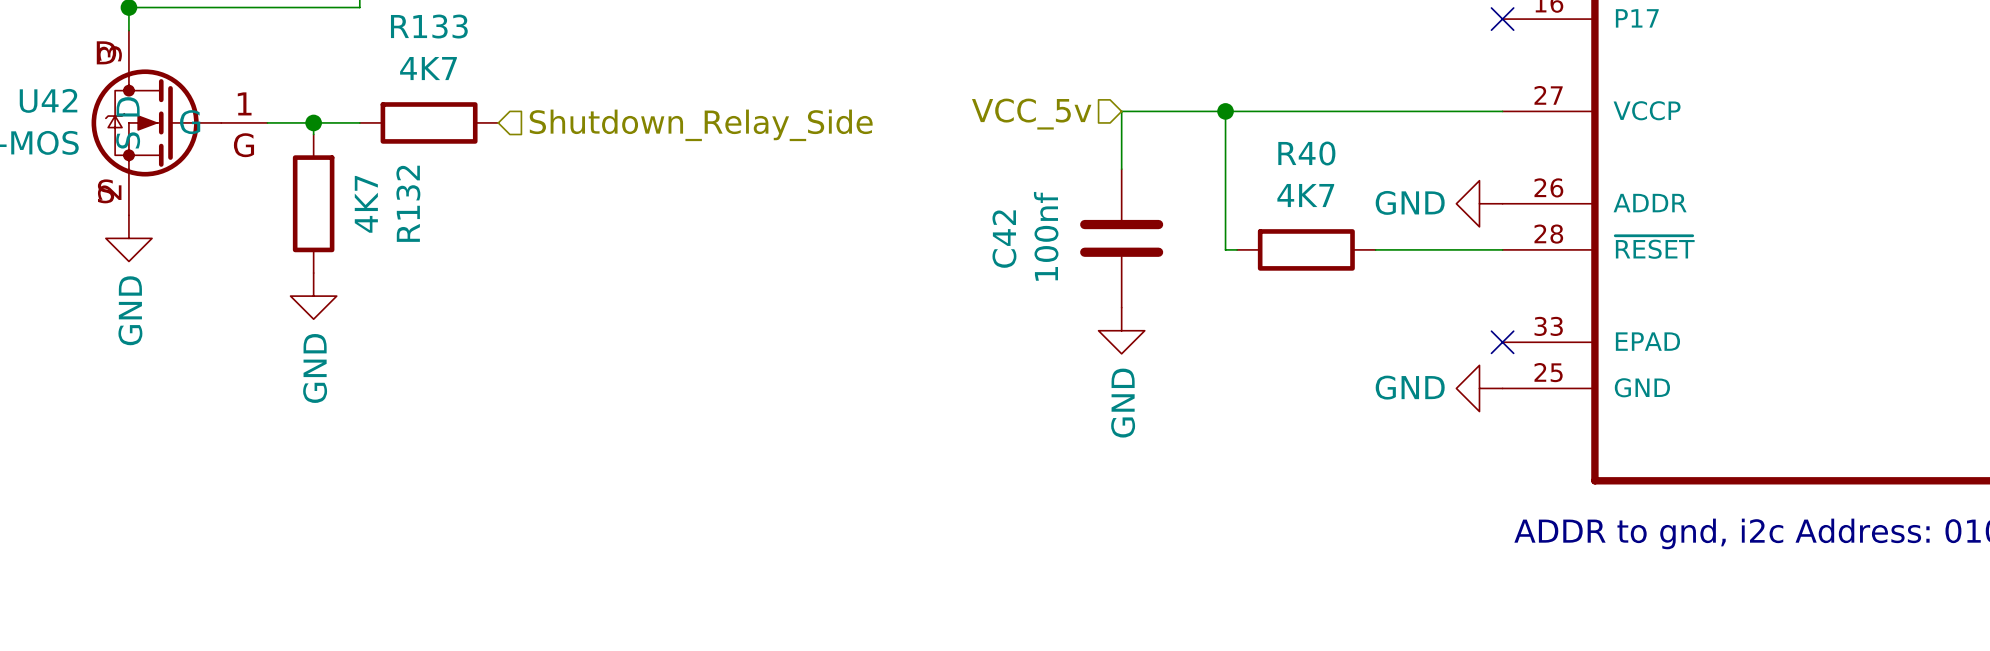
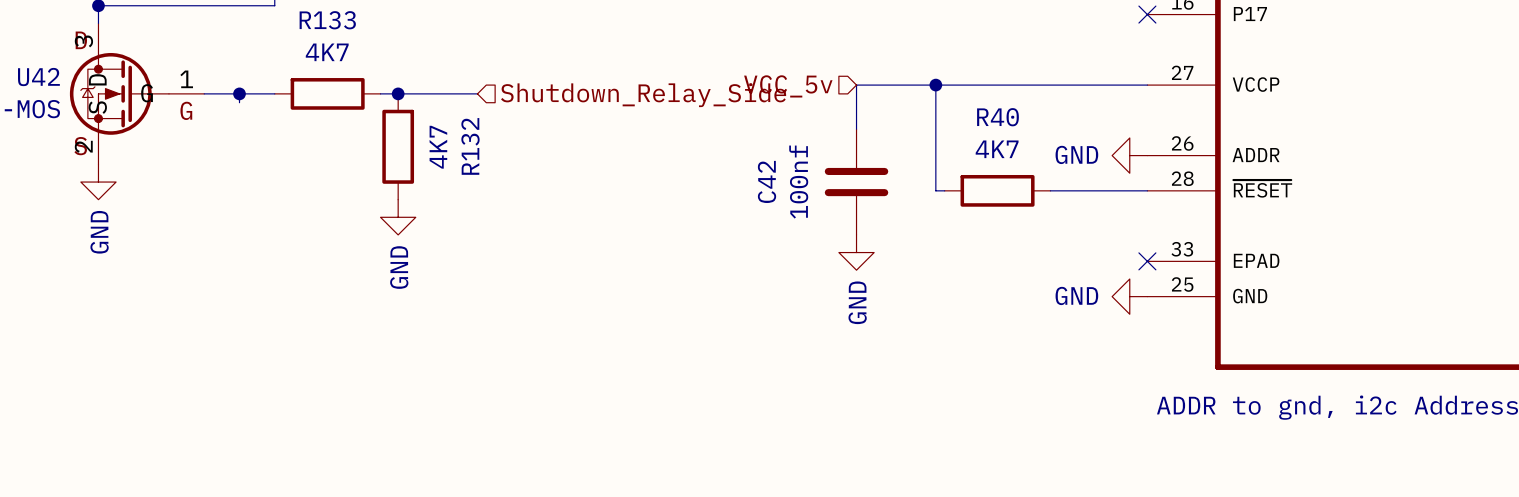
wire: none -> (380, 93) (477, 93)
junction: none -> (398, 93)
hierarchical label position: Shutdown_Relay_Side (701, 125) -> Shutdown_Relay_Side (643, 95)
R132 position: (313, 203) -> (398, 146)
power symbol position: GND (313, 296) -> GND (398, 217)

